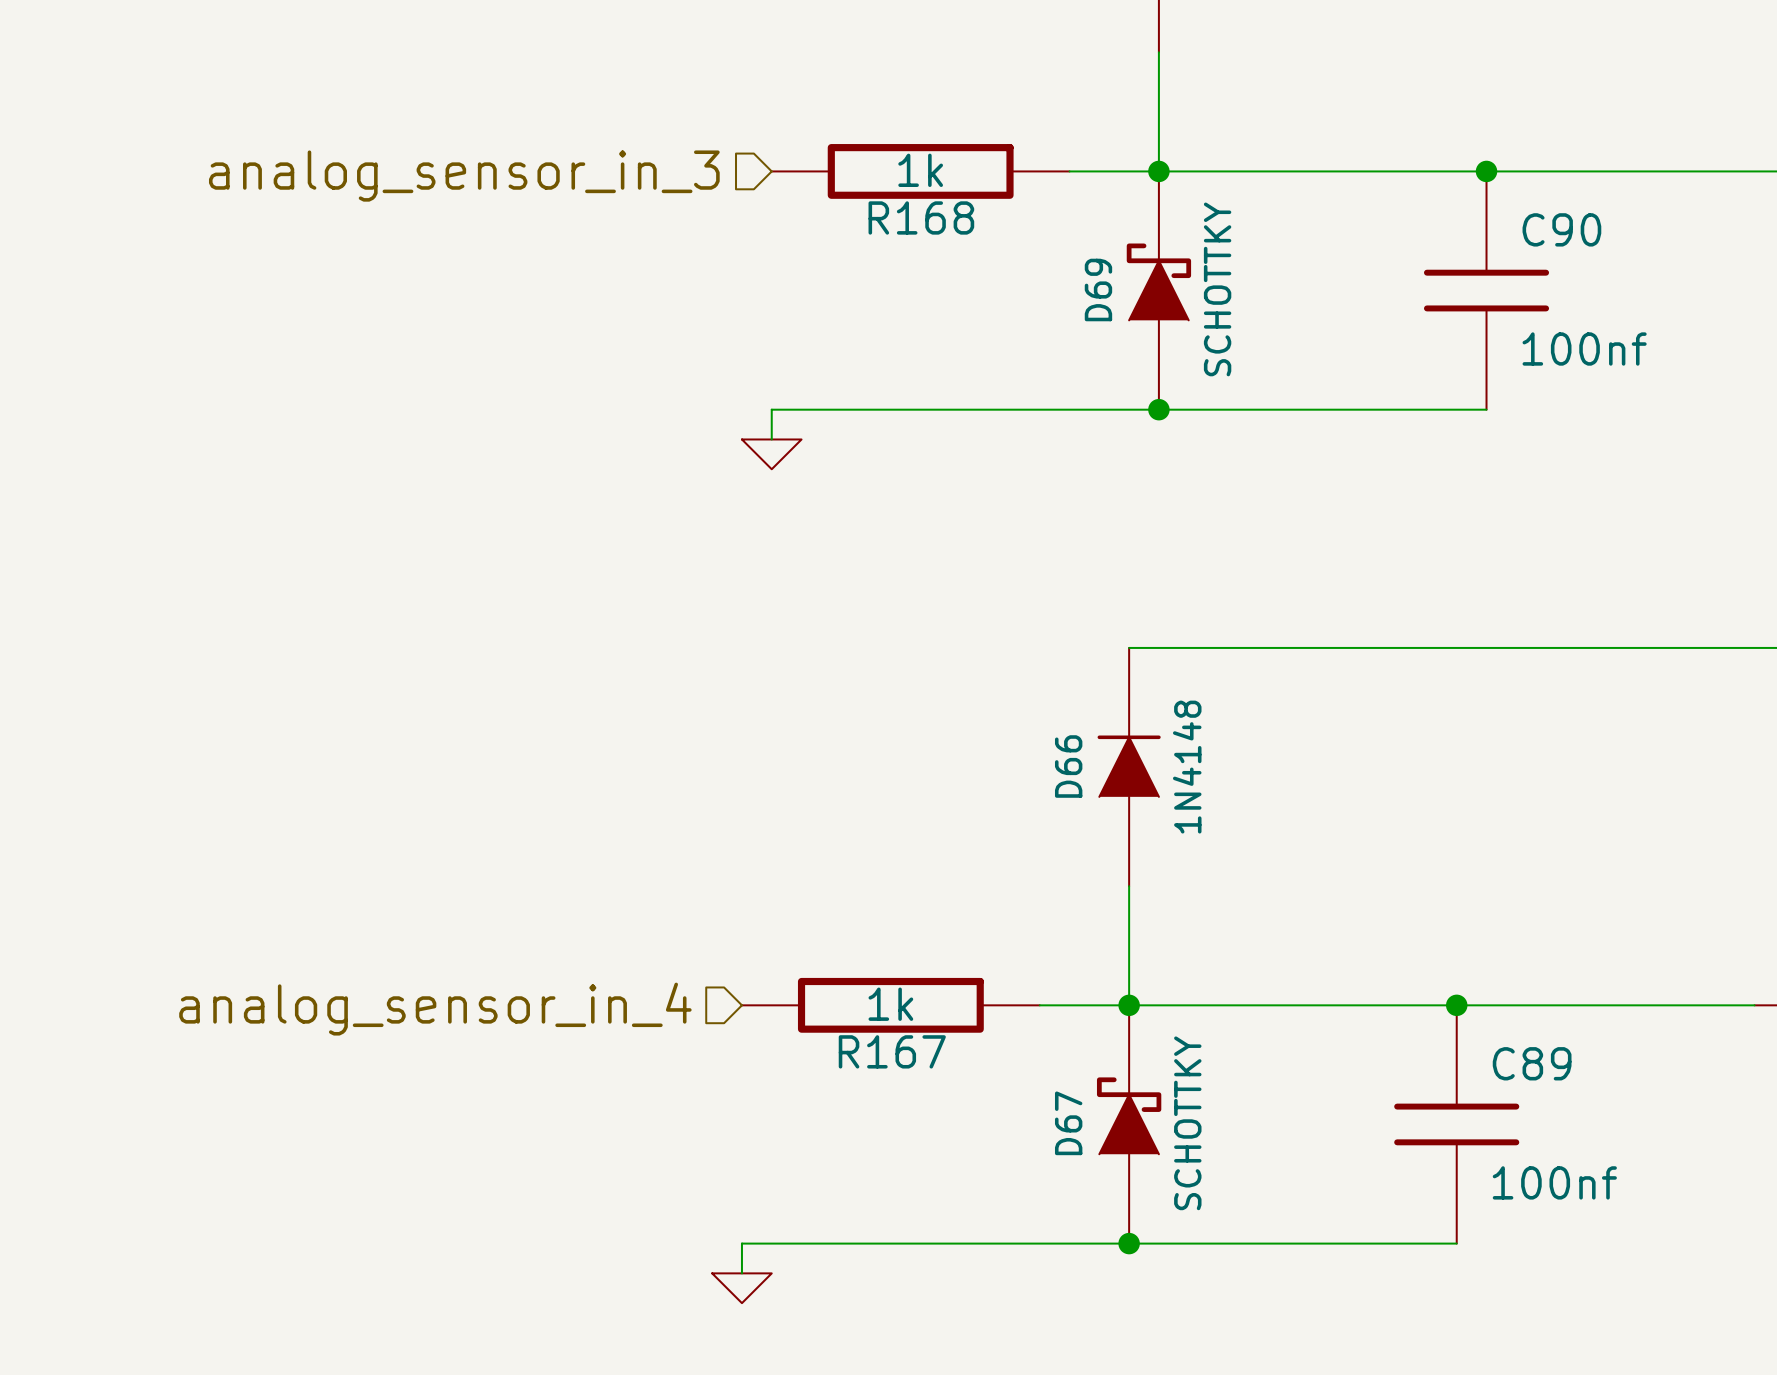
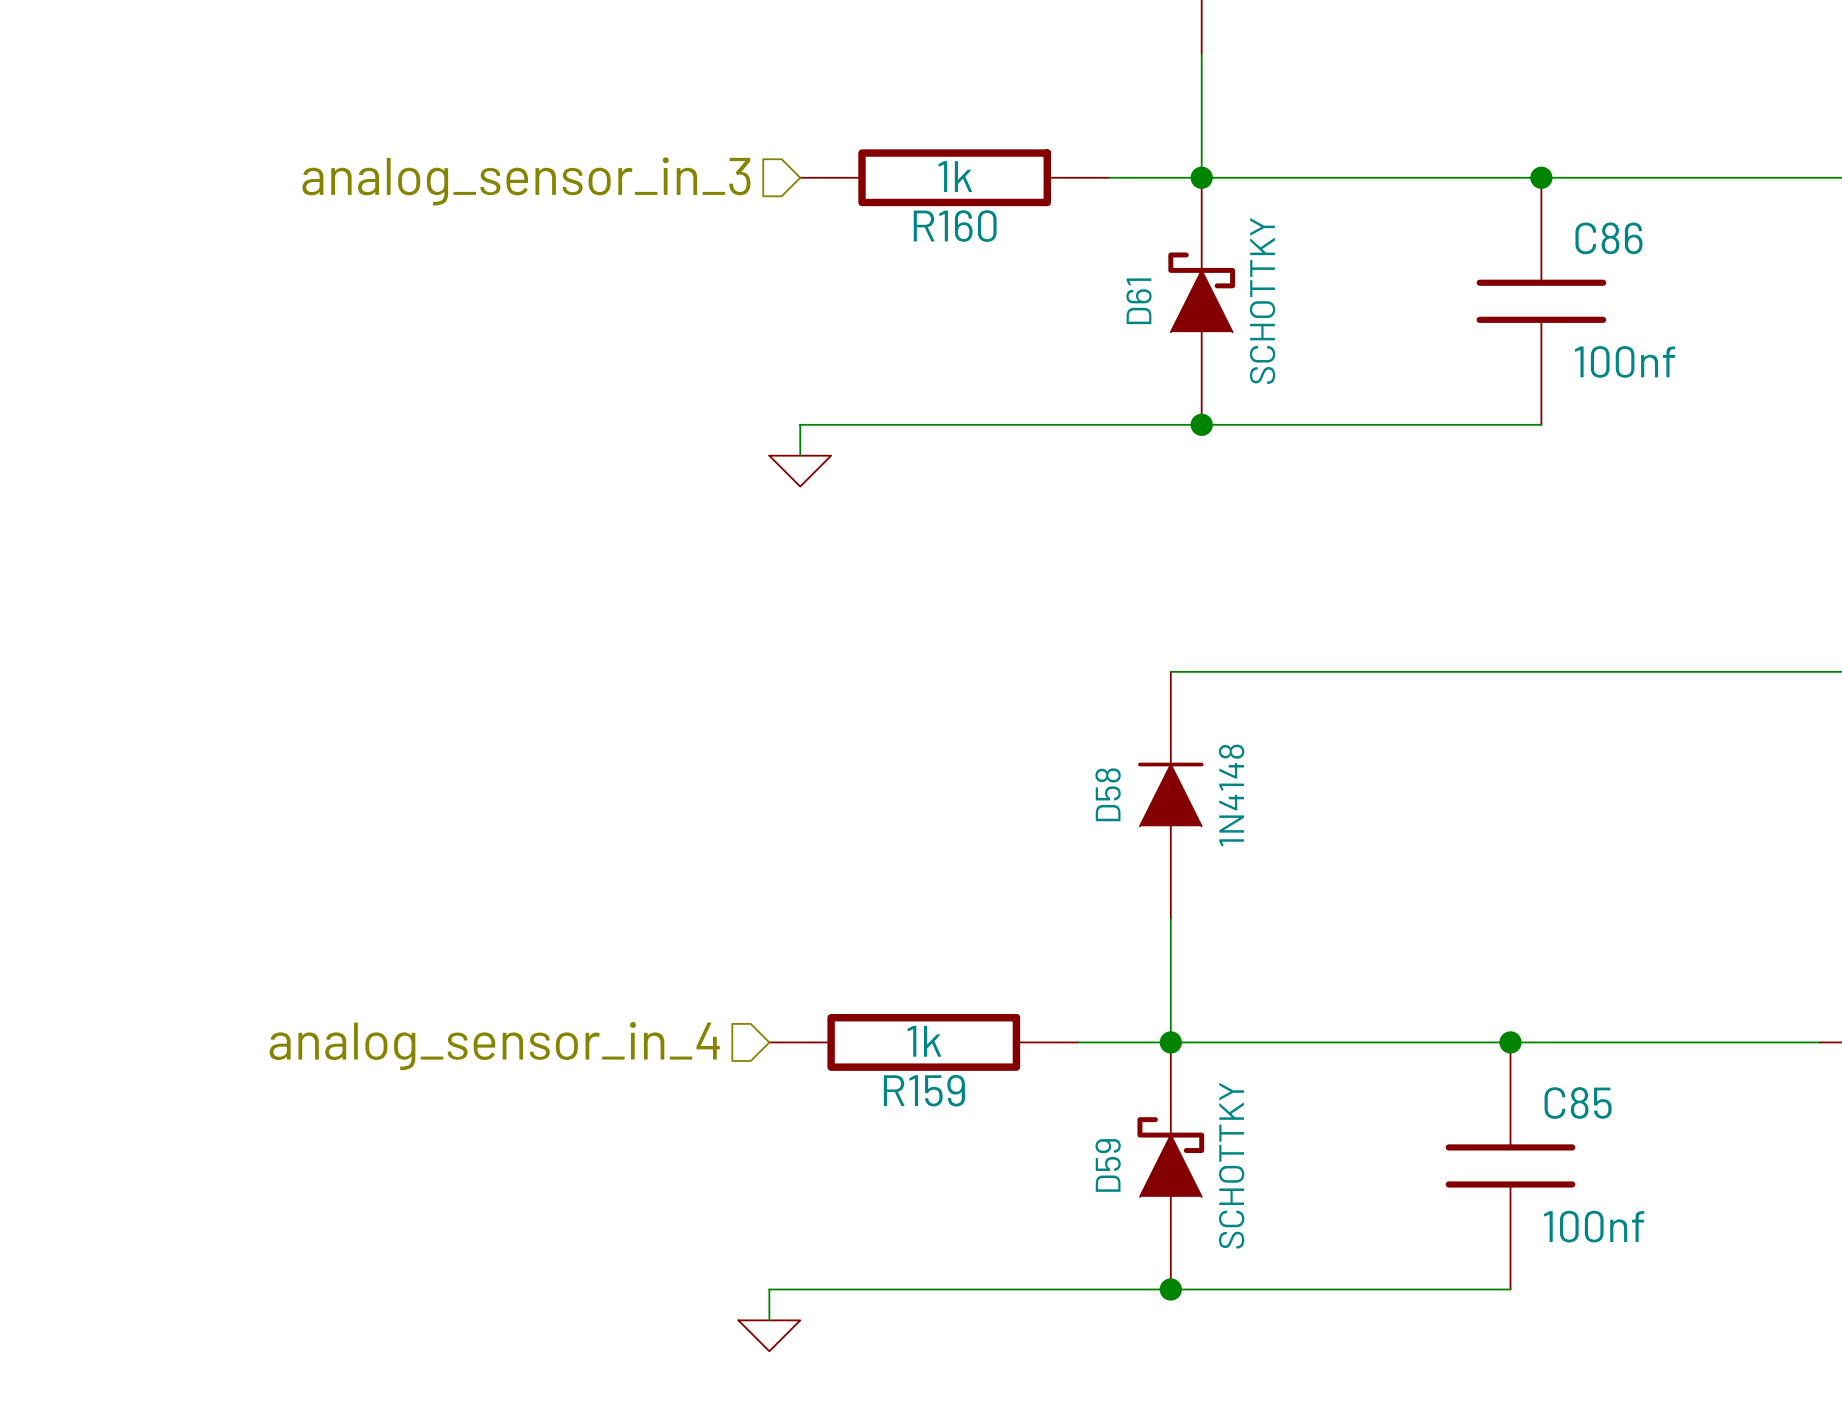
R168 name: R168 (921, 217) -> R160 (955, 226)
C90 name: C90 (1561, 229) -> C86 (1608, 238)
D69 name: D69 (1098, 289) -> D61 (1138, 301)
D66 name: D66 (1068, 766) -> D58 (1108, 794)
R167 name: R167 (892, 1051) -> R159 (924, 1090)
C89 name: C89 (1532, 1063) -> C85 (1578, 1103)
D67 name: D67 (1068, 1123) -> D59 (1108, 1165)

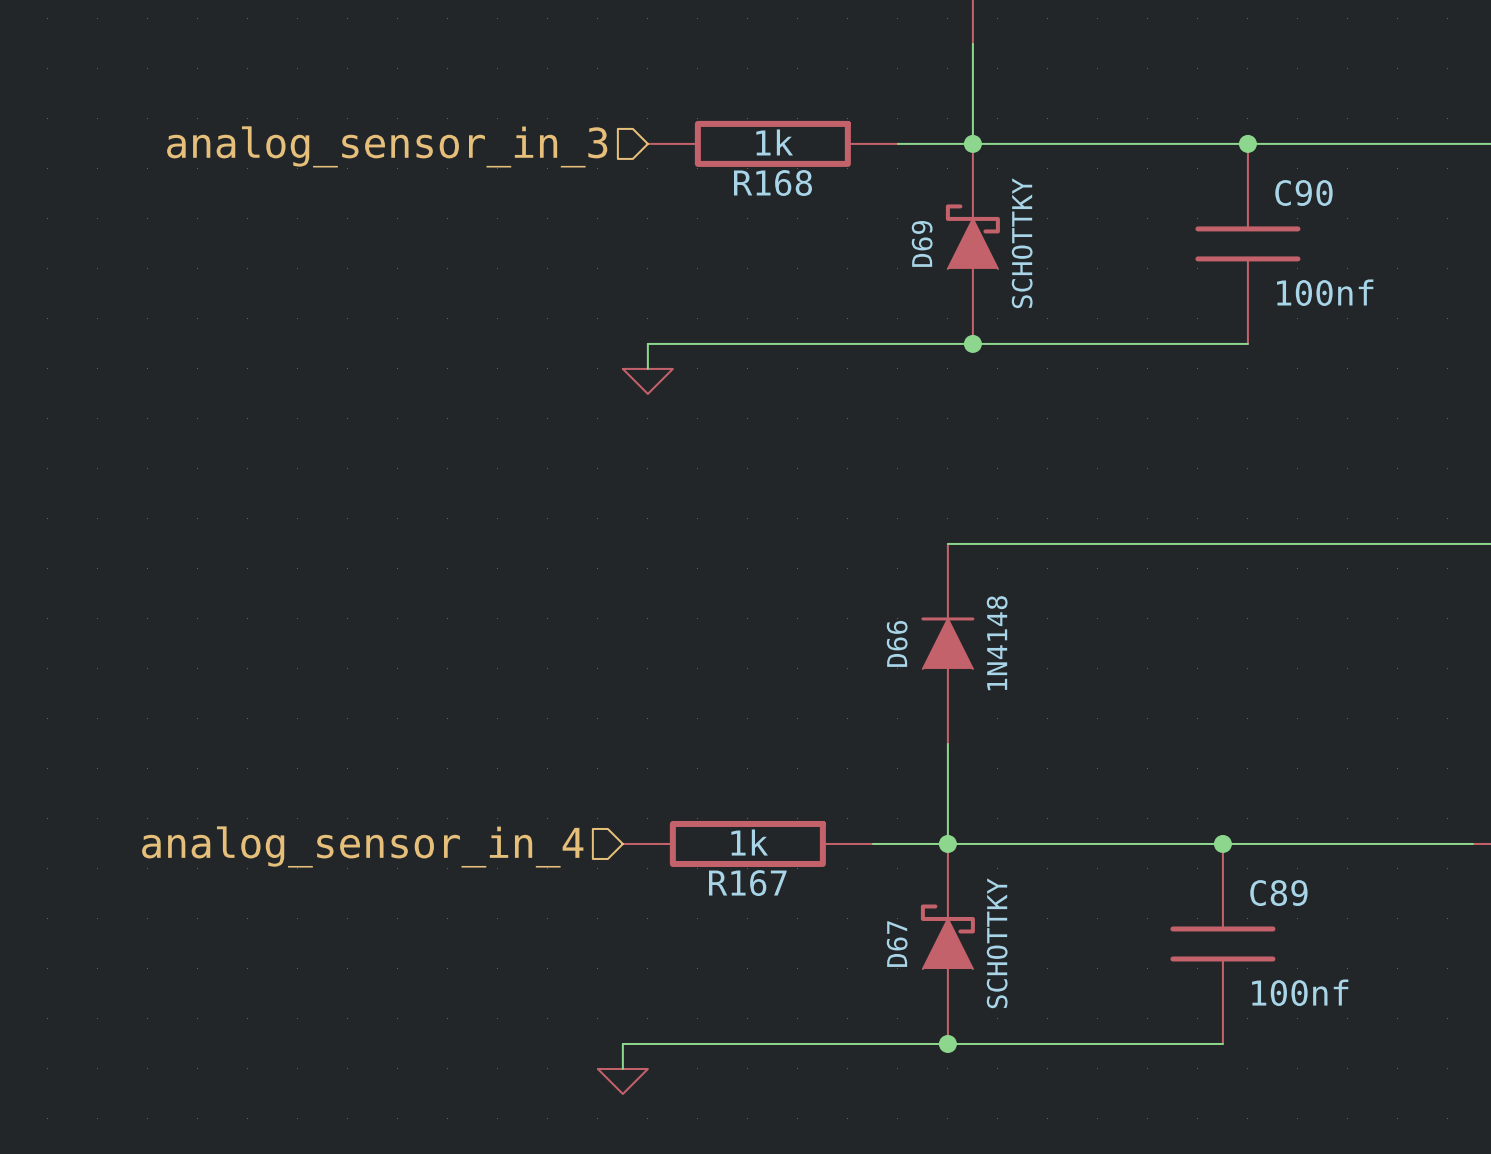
R160 name: R160 (955, 226) -> R168 (772, 183)
C86 name: C86 (1608, 238) -> C90 (1303, 193)
D61 name: D61 (1138, 301) -> D69 (922, 243)
D58 name: D58 (1108, 794) -> D66 (897, 643)
R159 name: R159 (924, 1090) -> R167 (747, 883)
C85 name: C85 (1578, 1103) -> C89 (1278, 893)
D59 name: D59 (1108, 1165) -> D67 (897, 944)

